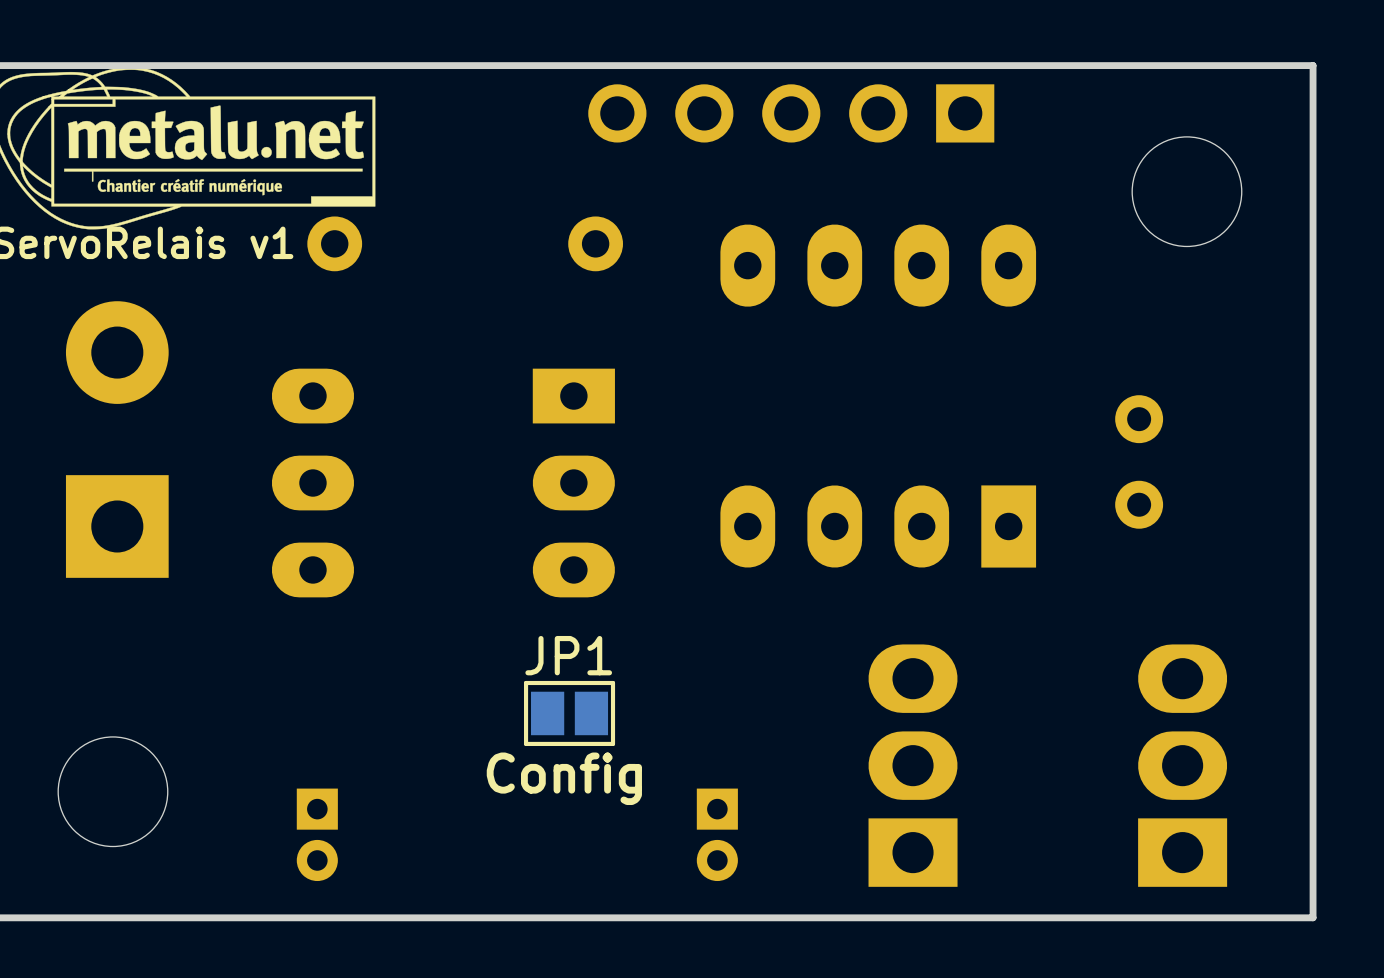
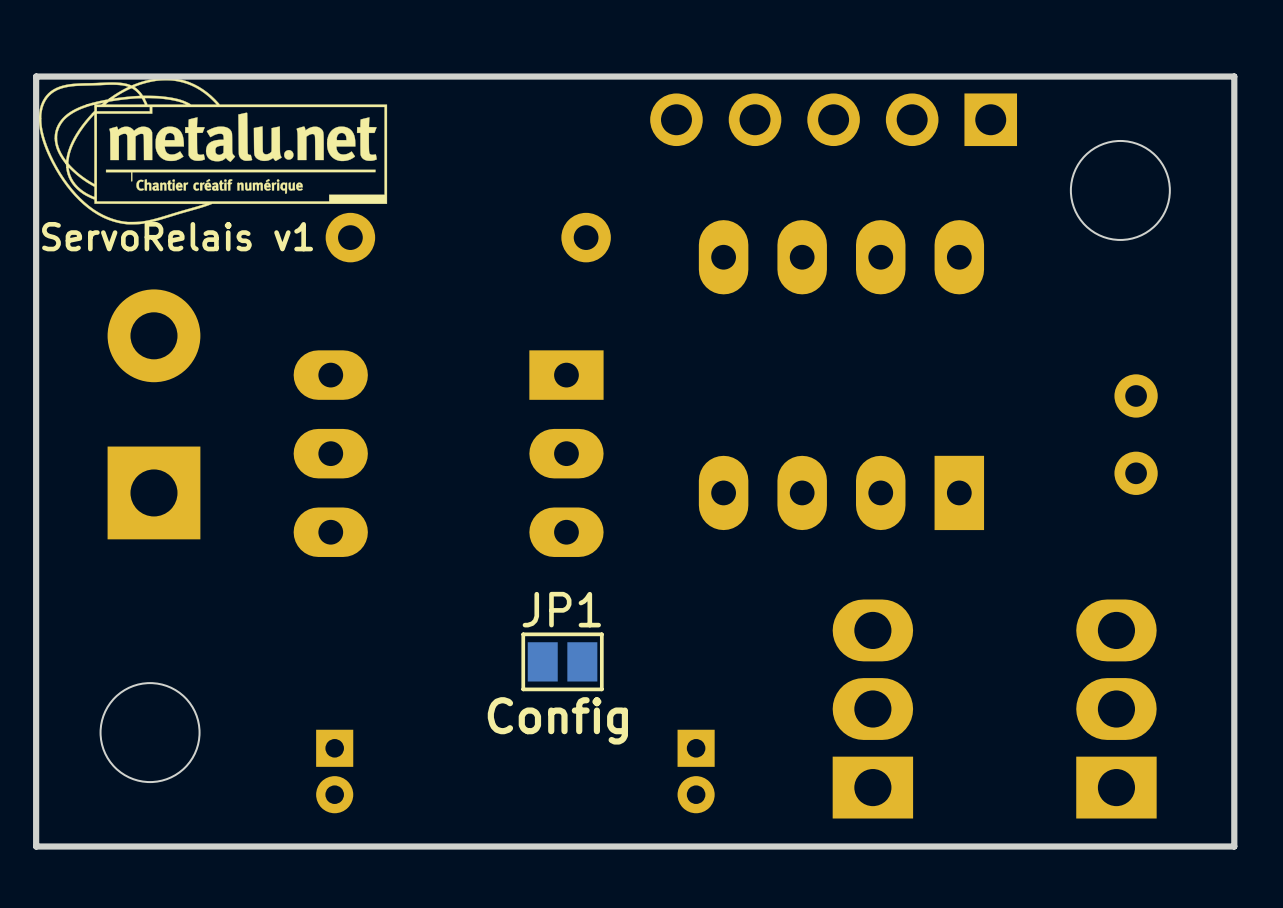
part position: (791, 113) -> (833, 119)
part position: (1139, 461) -> (1136, 434)

